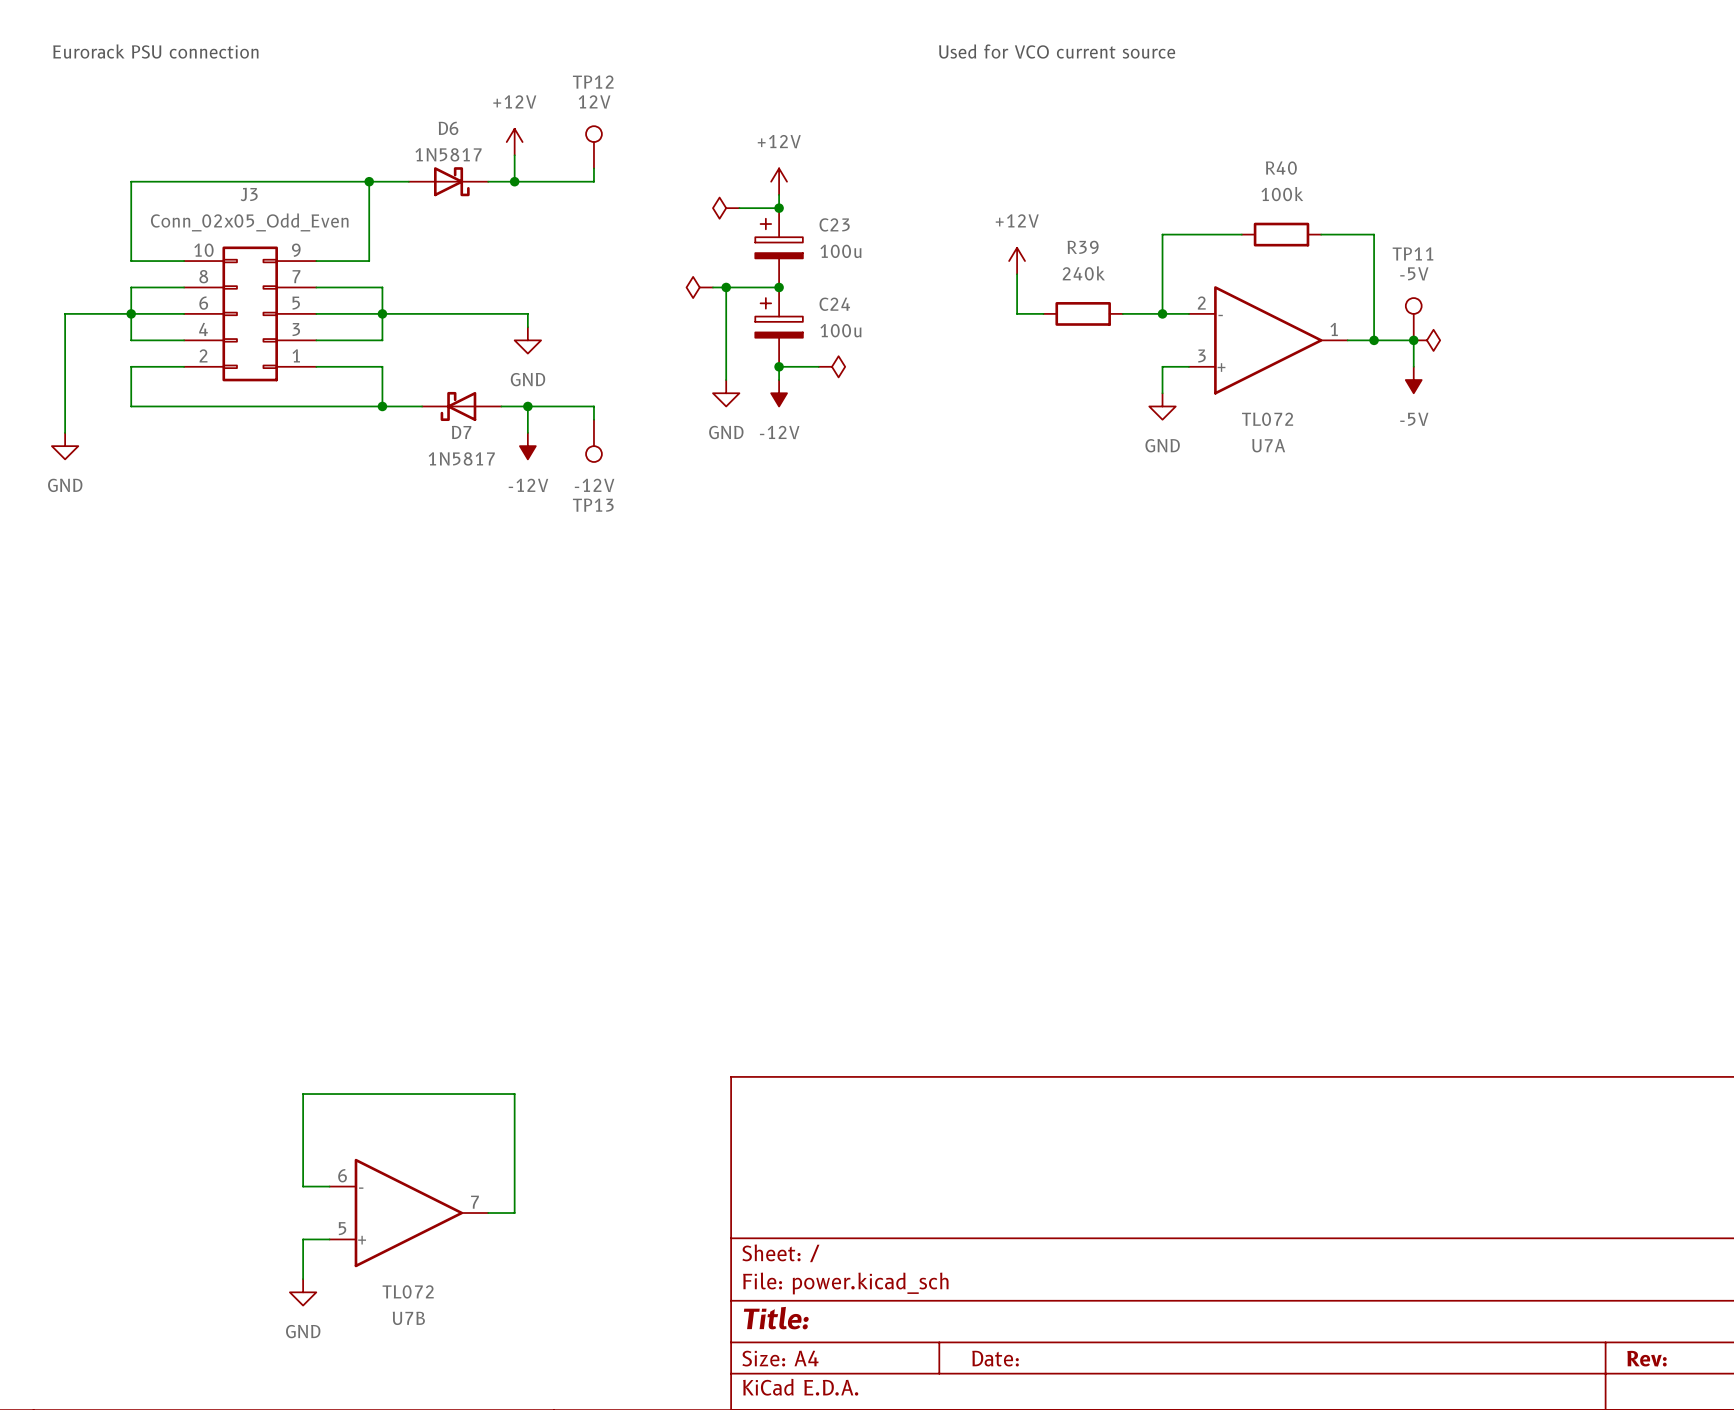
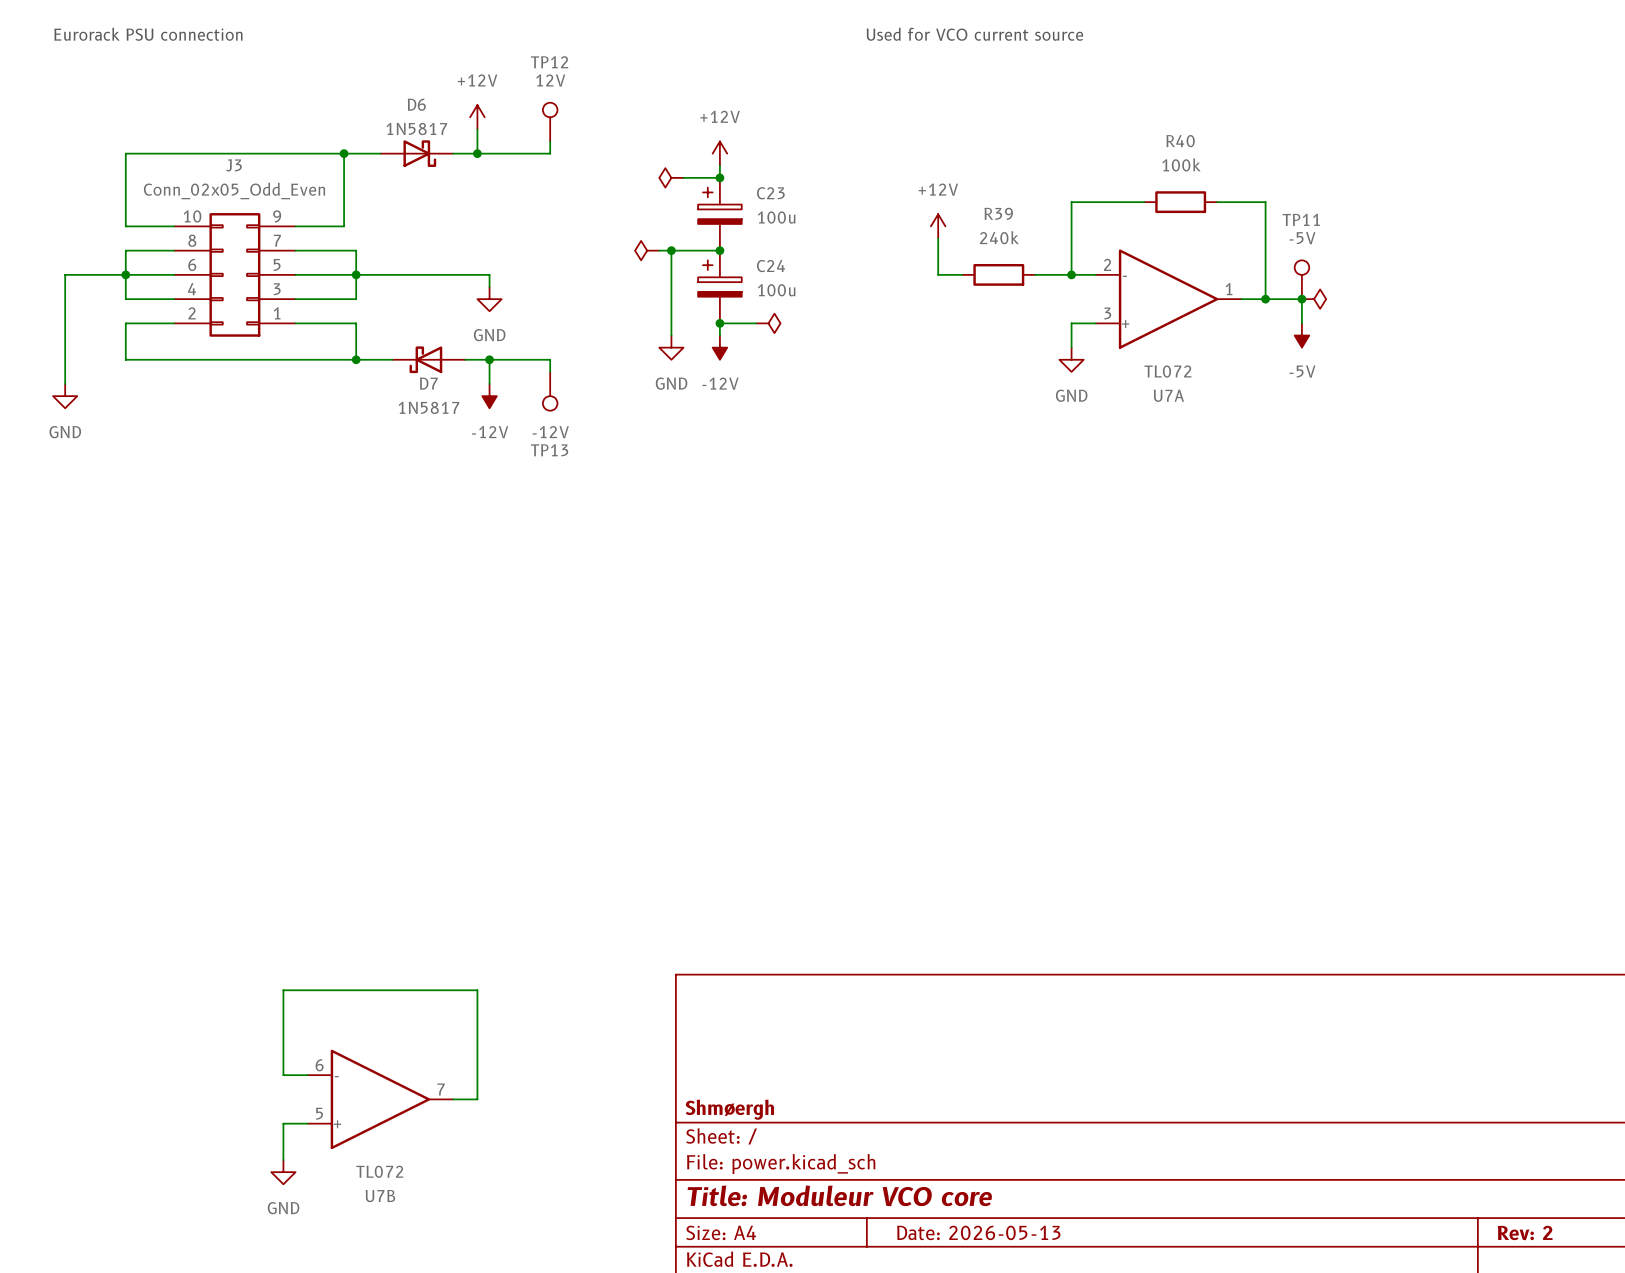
title block: none -> Shmøergh (729, 1109)
title block: Title: (776, 1318) -> Title: Moduleur VCO core (839, 1195)
title block: Date: (995, 1358) -> Date: 2026-05-13 (978, 1232)
title block: Rev: (1646, 1358) -> Rev: 2 (1525, 1232)

